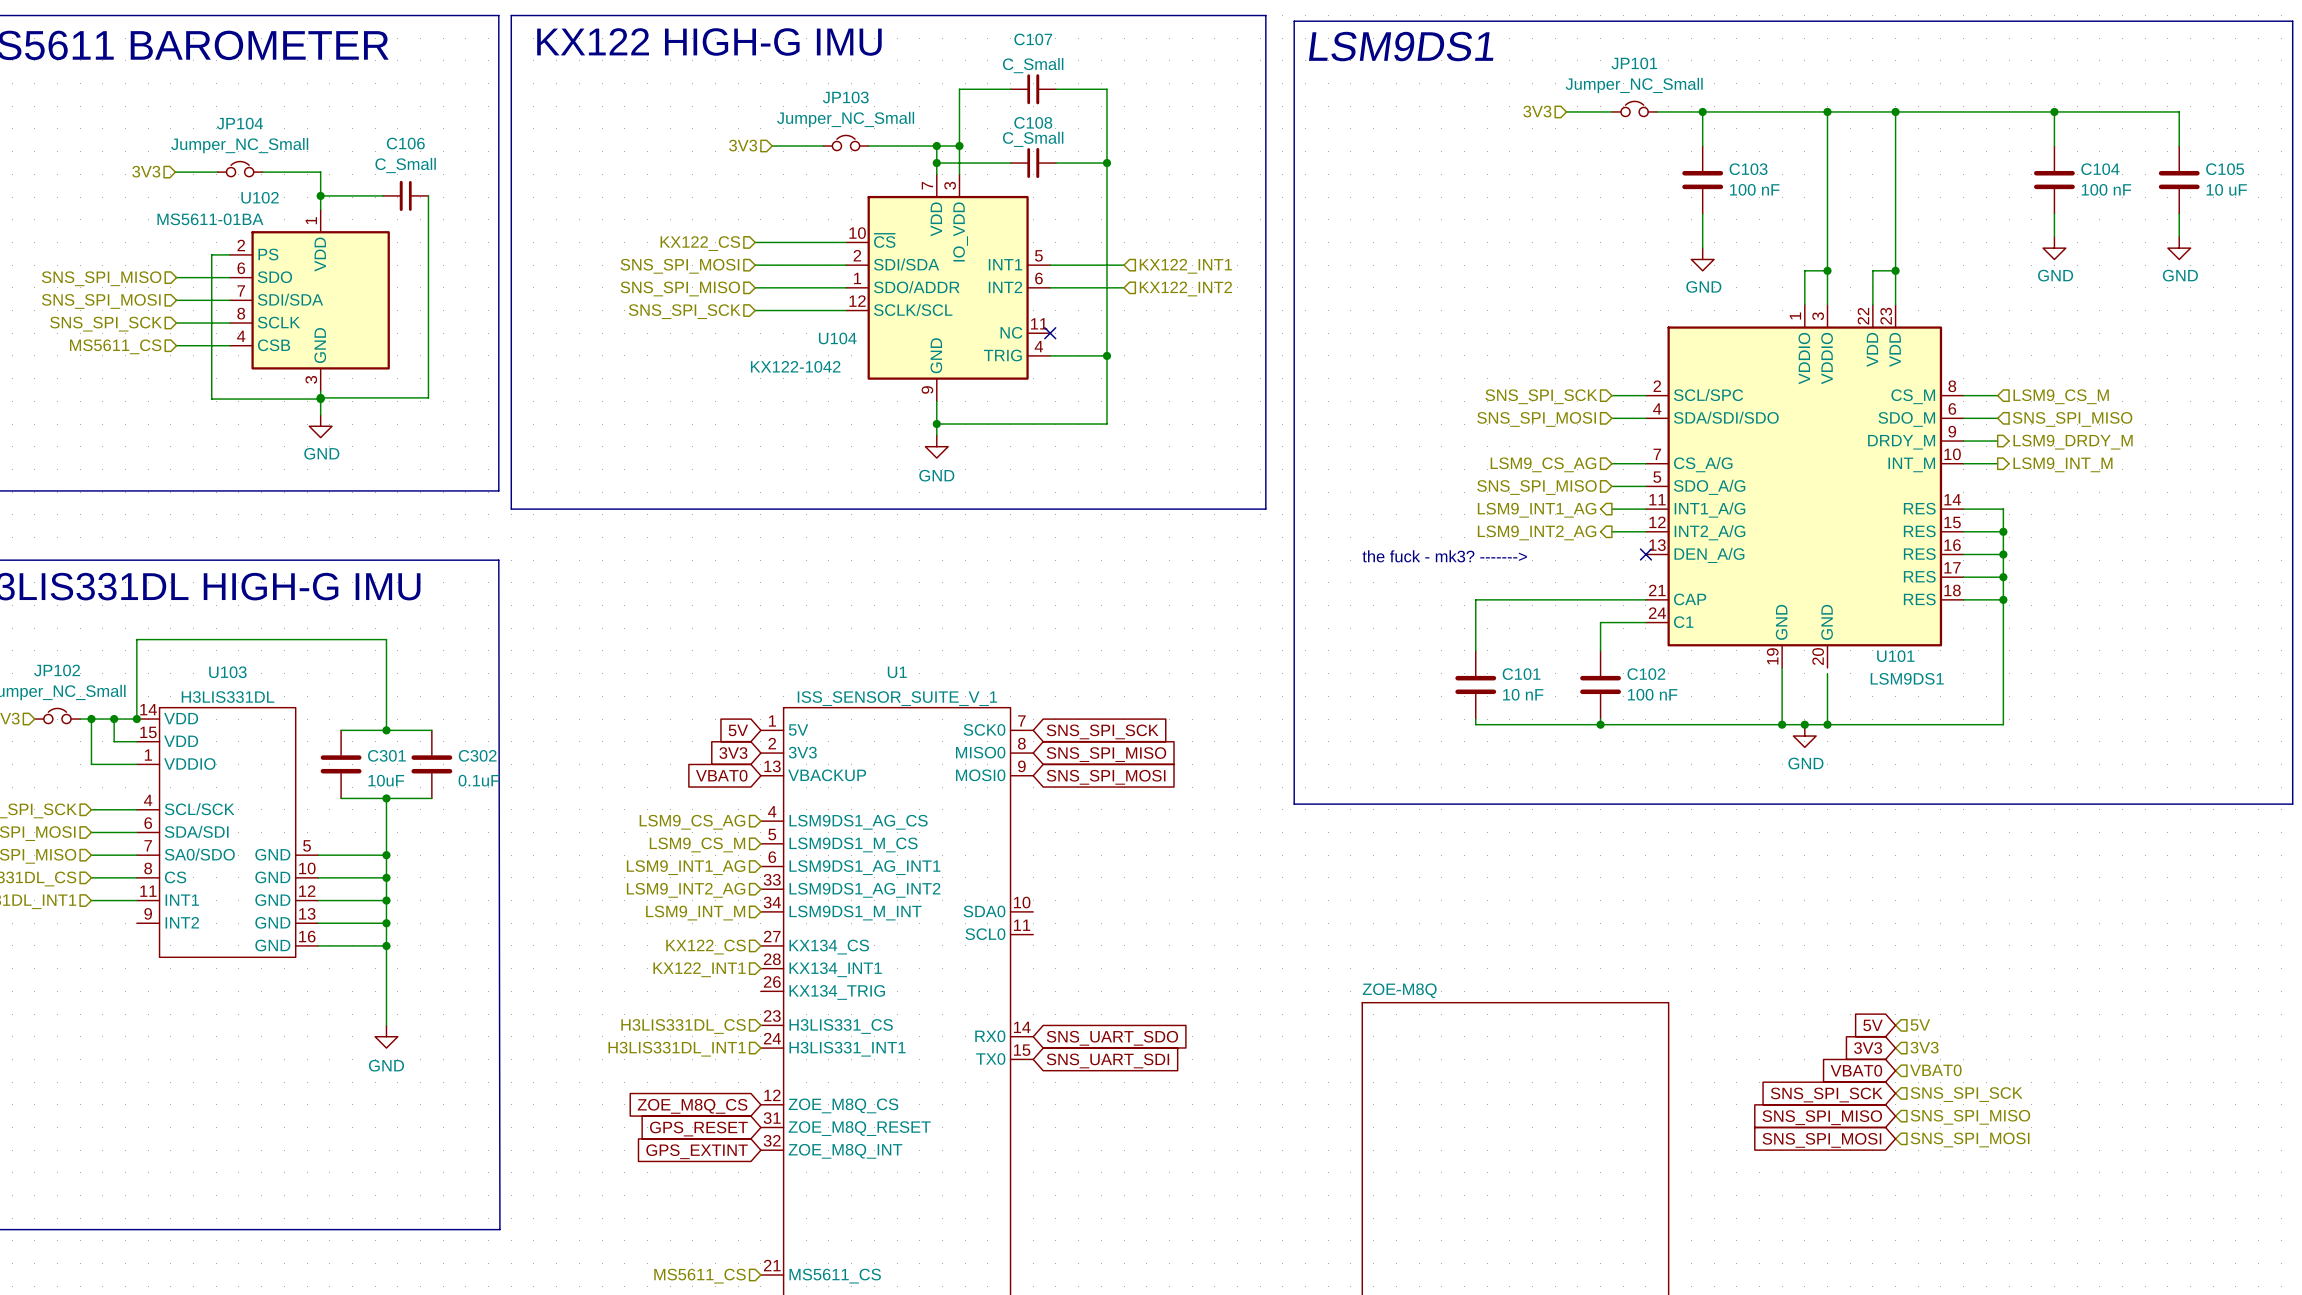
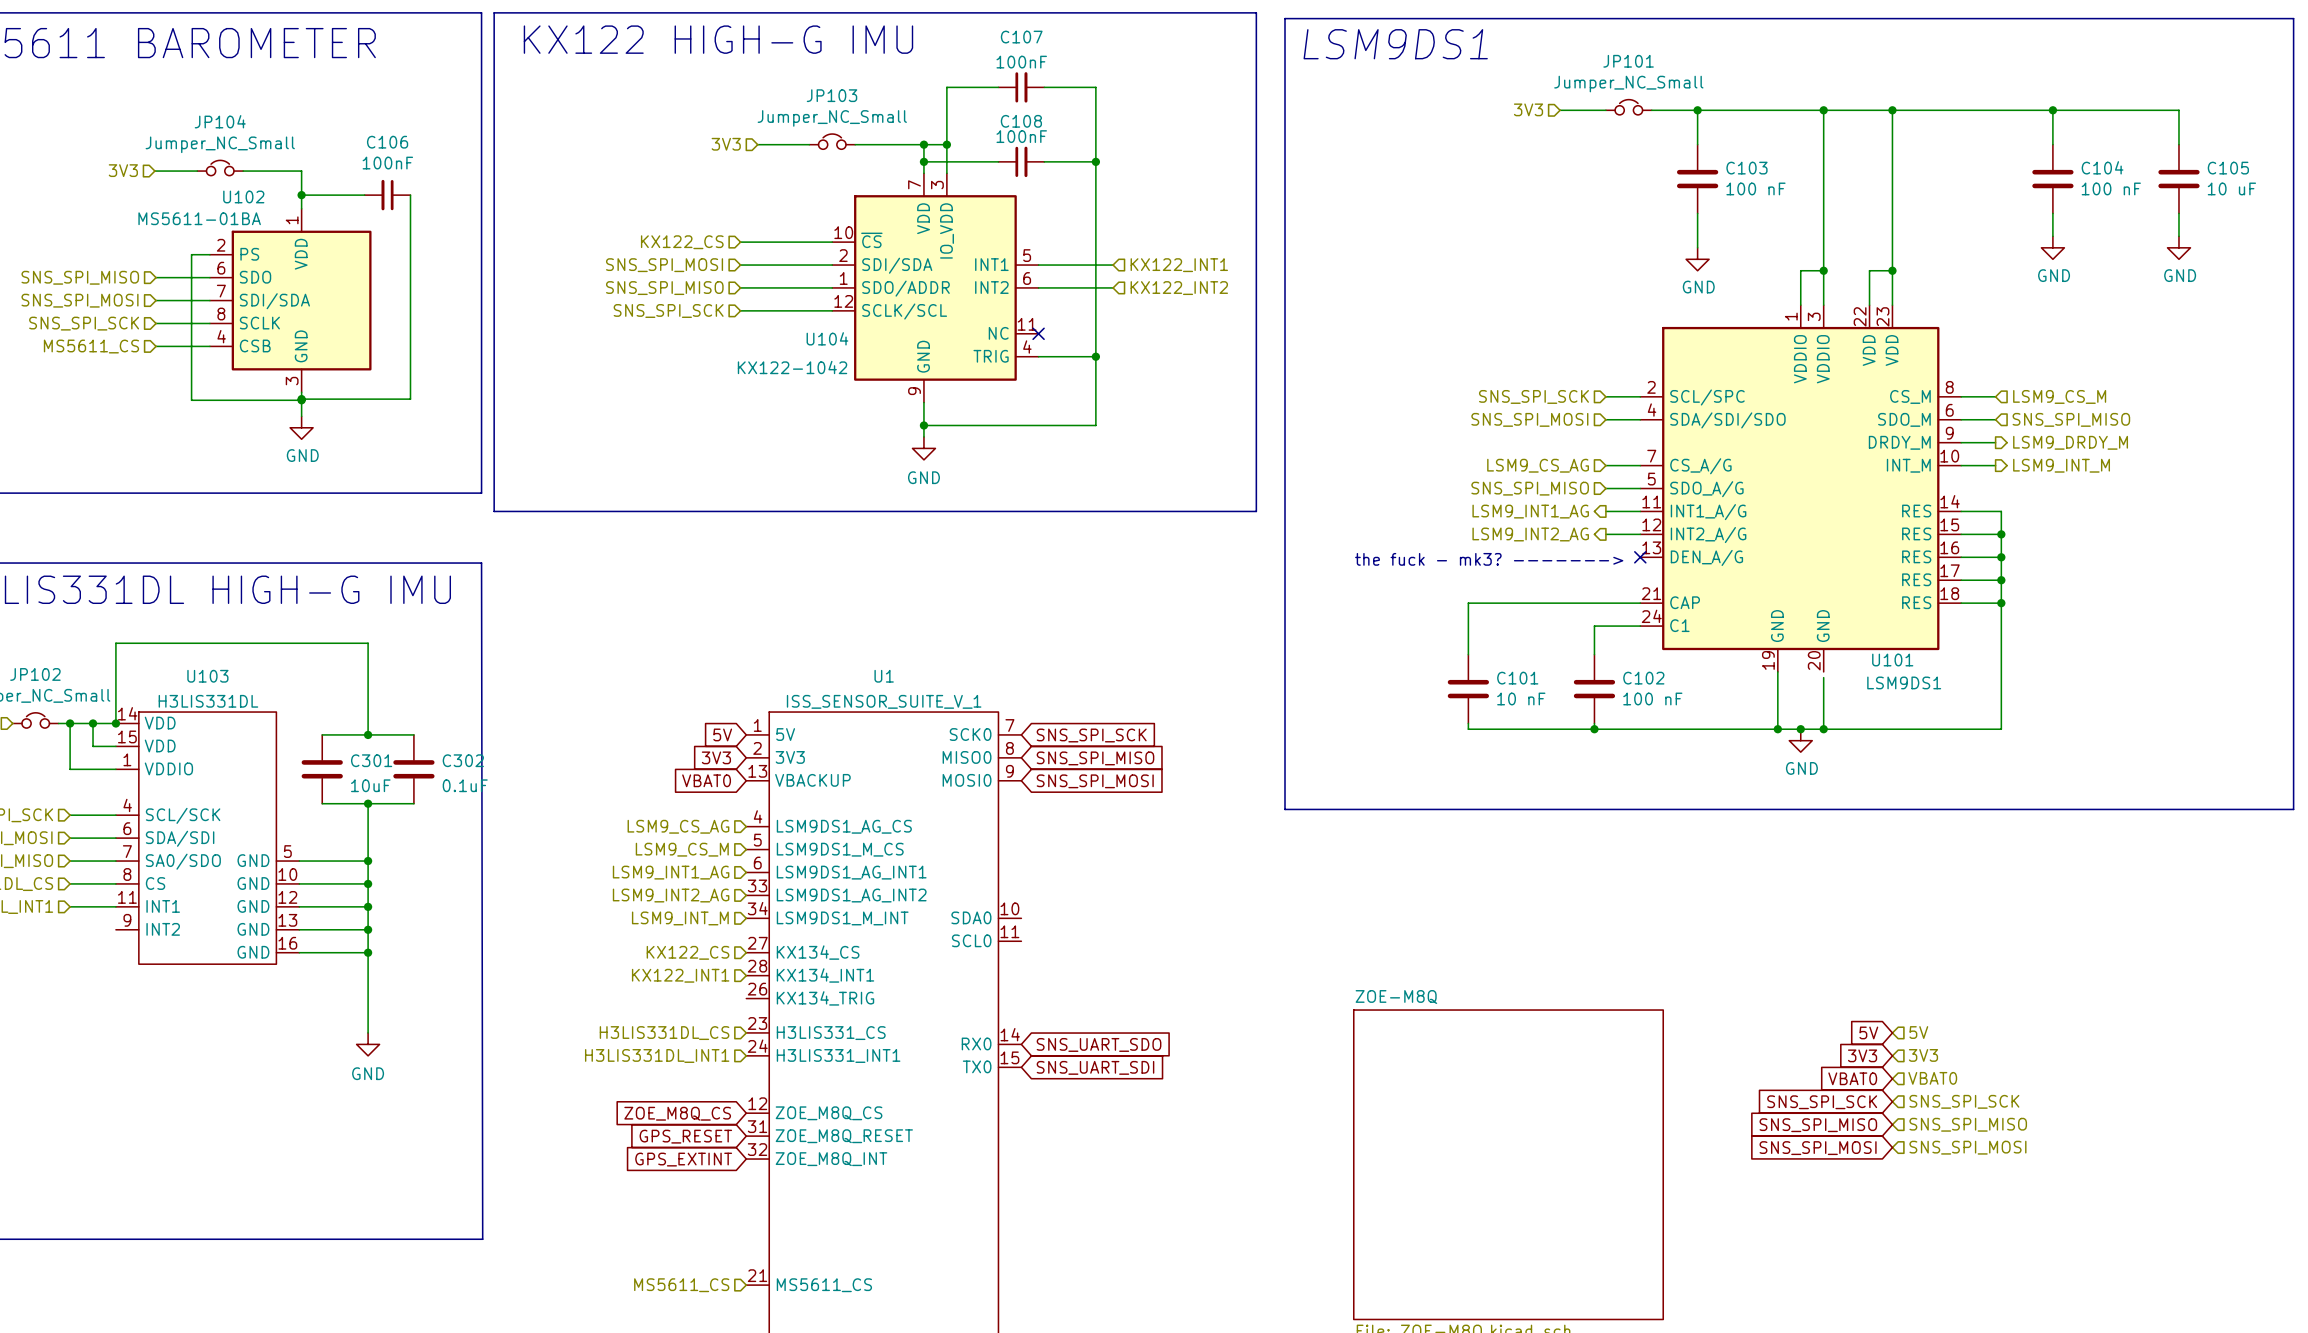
C107 value: C_Small (1033, 65) -> 100nF (1021, 62)
C108 value: C_Small (1033, 139) -> 100nF (1021, 136)
C106 value: C_Small (405, 165) -> 100nF (387, 163)

